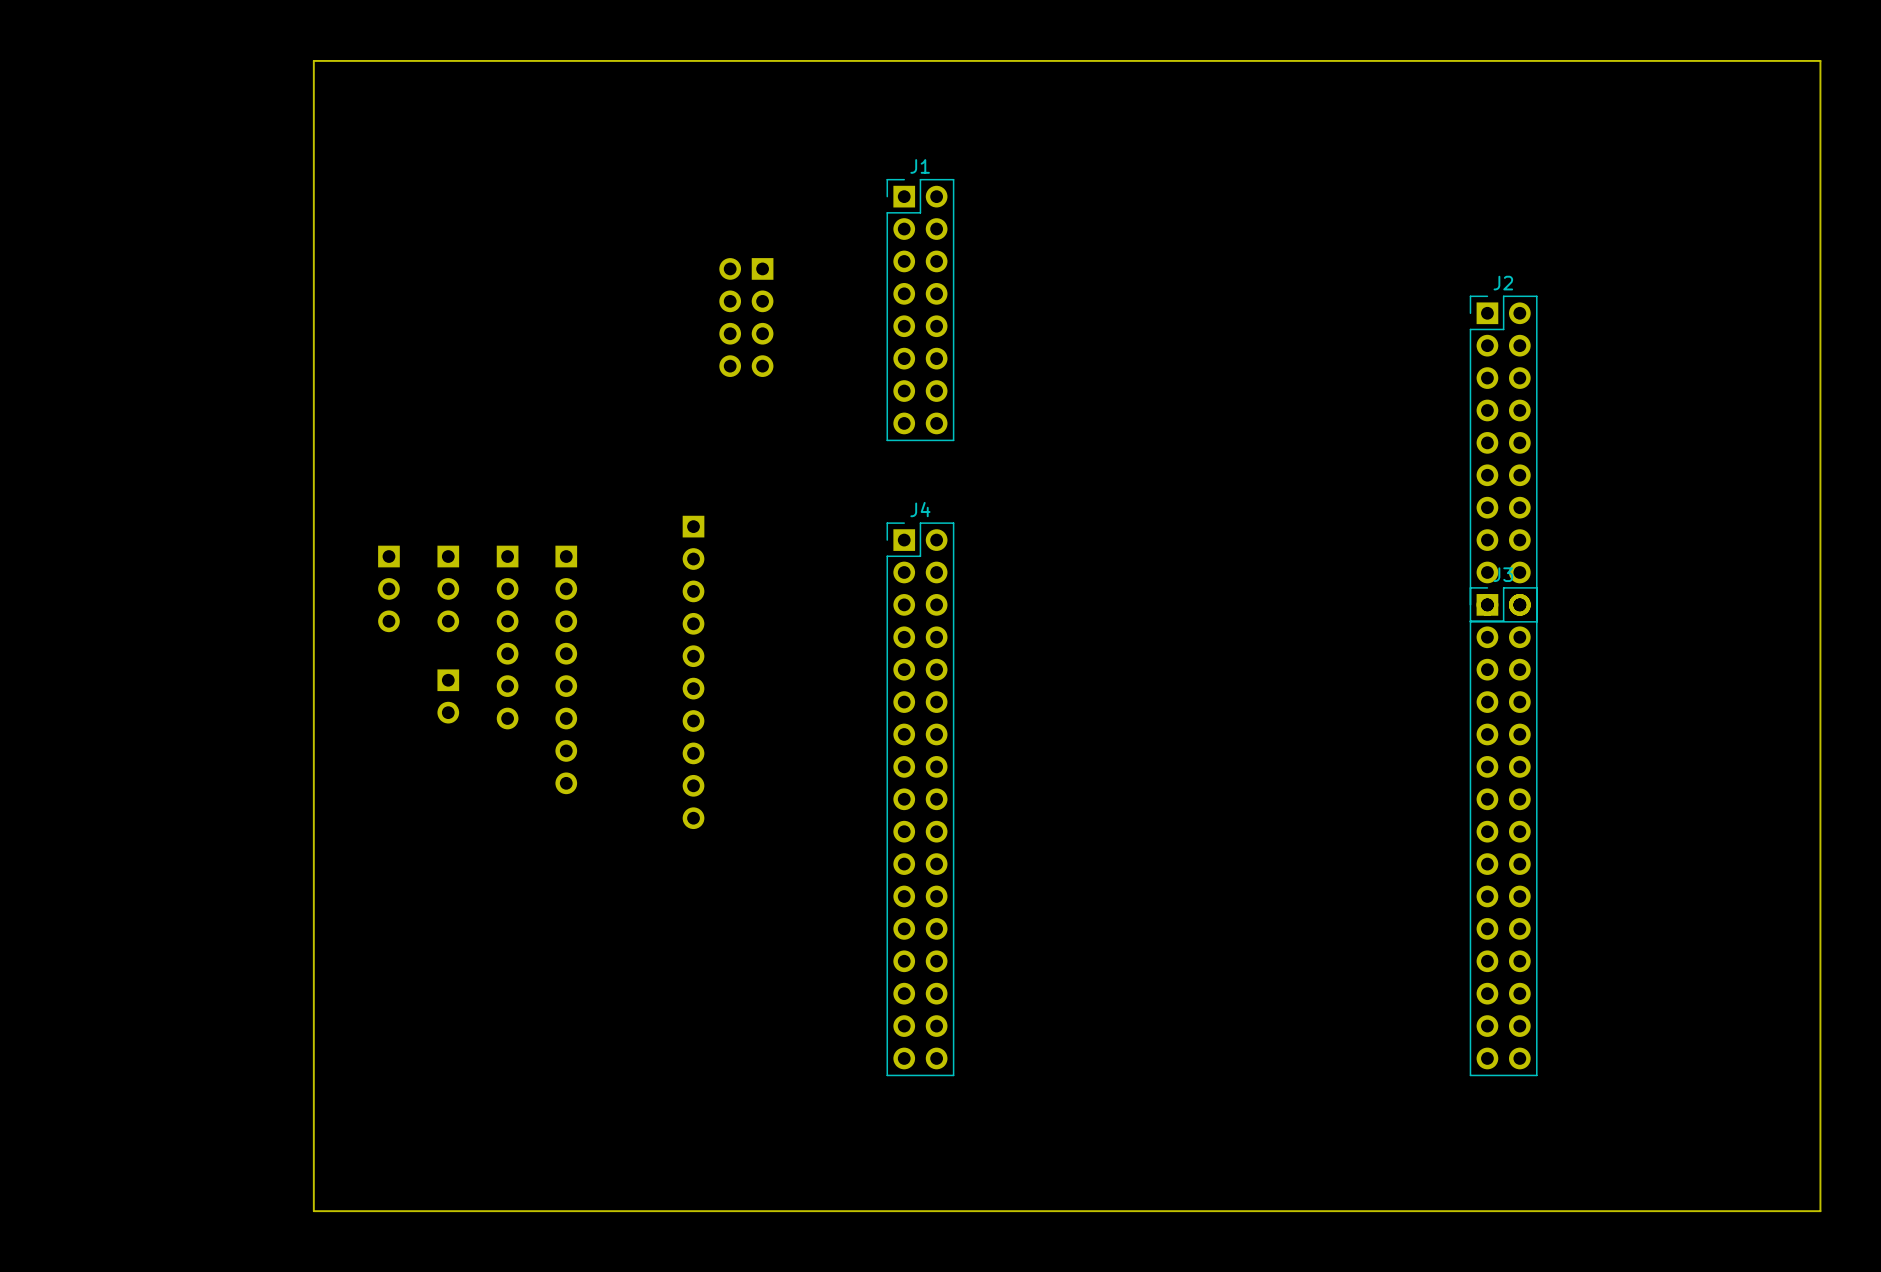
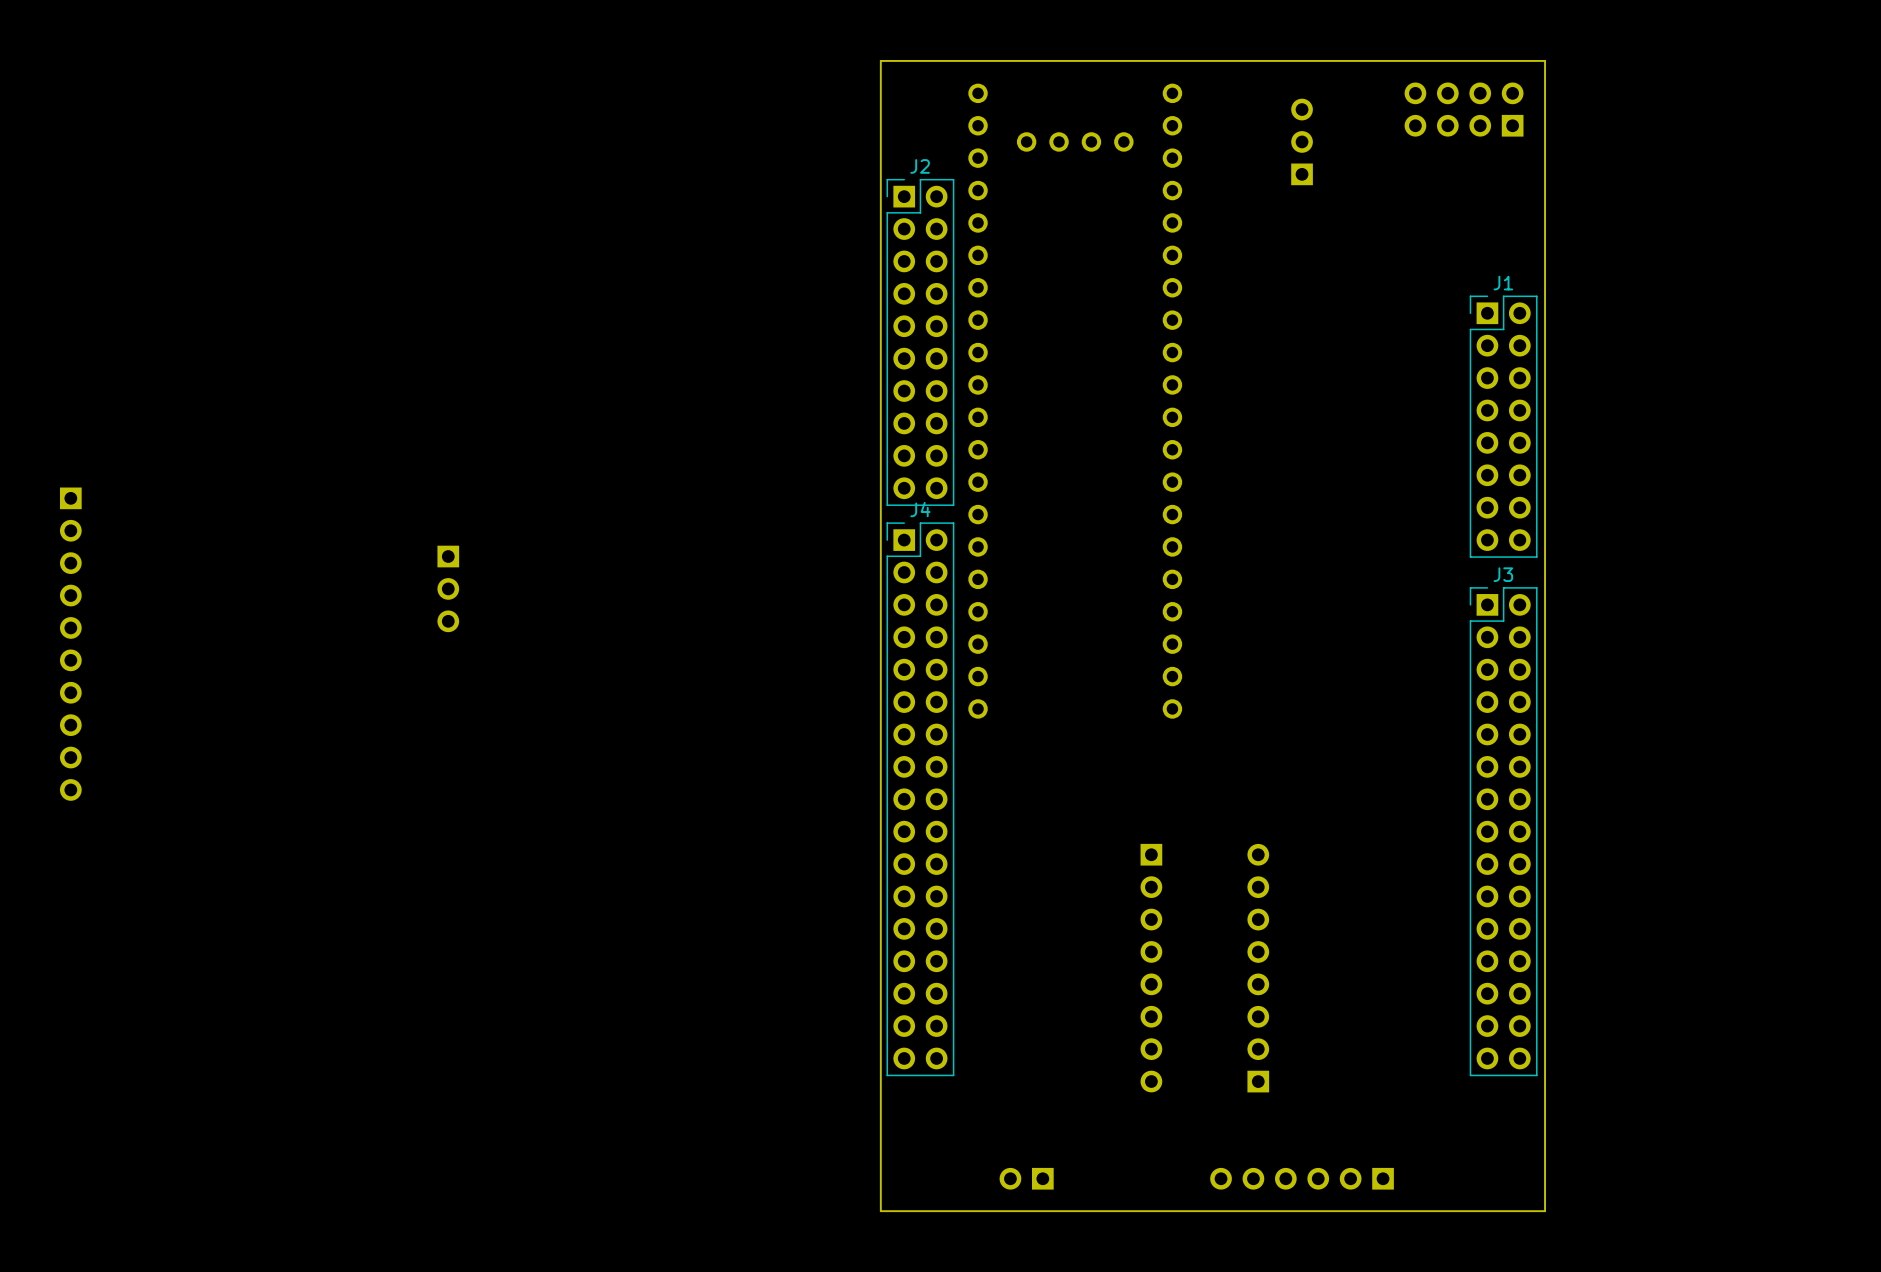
board edge: (880, 60) (313, 60) (313, 1211) (880, 1211) -> (880, 60) (880, 1211)
board edge: (1545, 60) (1820, 60) (1820, 1211) (1545, 1211) -> (1545, 60) (1545, 1211)
part: none -> (1464, 109)
part: none -> (1302, 141)
J1 position: (920, 310) -> (1503, 426)
part: (746, 317) -> none
part: none -> (1075, 401)
J2 position: (1503, 459) -> (920, 342)
part: (388, 588) -> none
part: (507, 637) -> none
part: none -> (70, 644)
part: (566, 669) -> none
part: (693, 672) -> none
part: (448, 696) -> none
part: none -> (1151, 968)
part: none -> (1258, 968)
part: none -> (1026, 1178)
part: none -> (1302, 1178)

